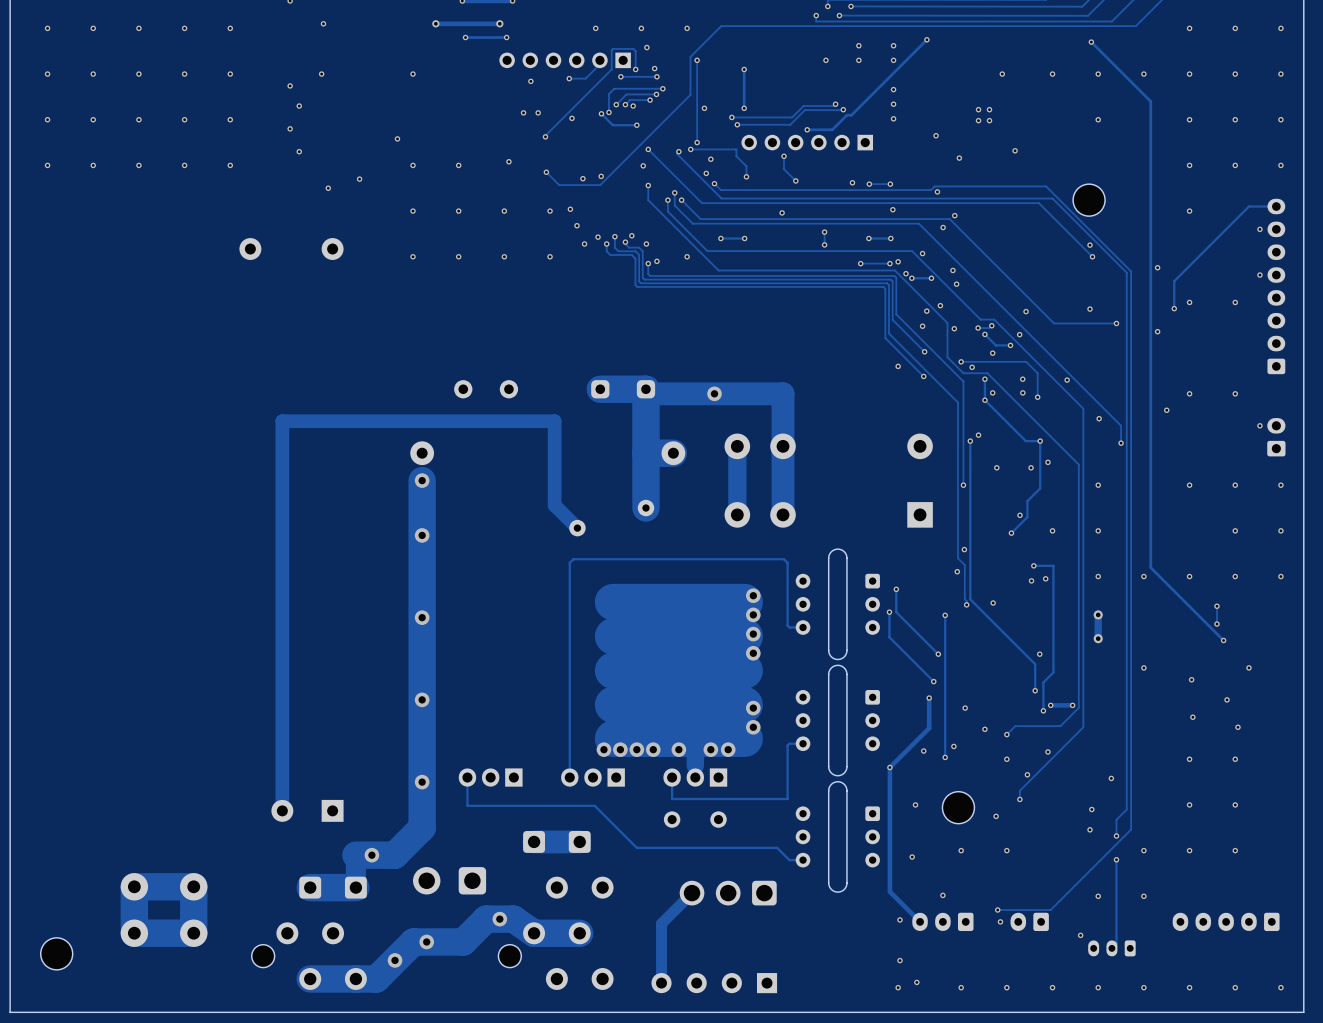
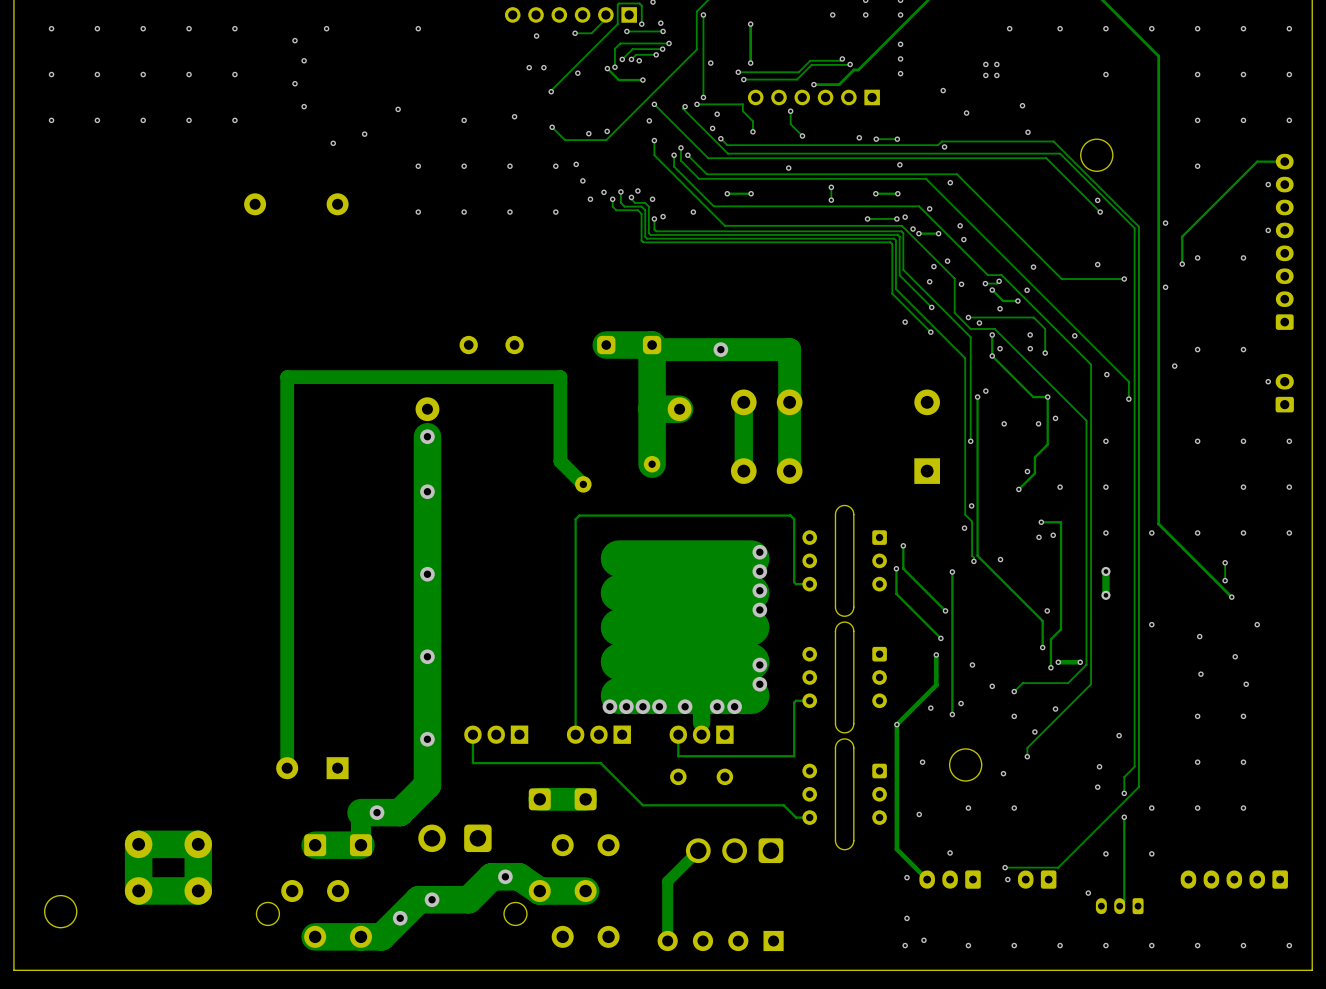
via: (397, 138) -> none
via: none -> (398, 109)
via: (413, 165) -> none
via: none -> (1028, 132)
via: (954, 215) -> none

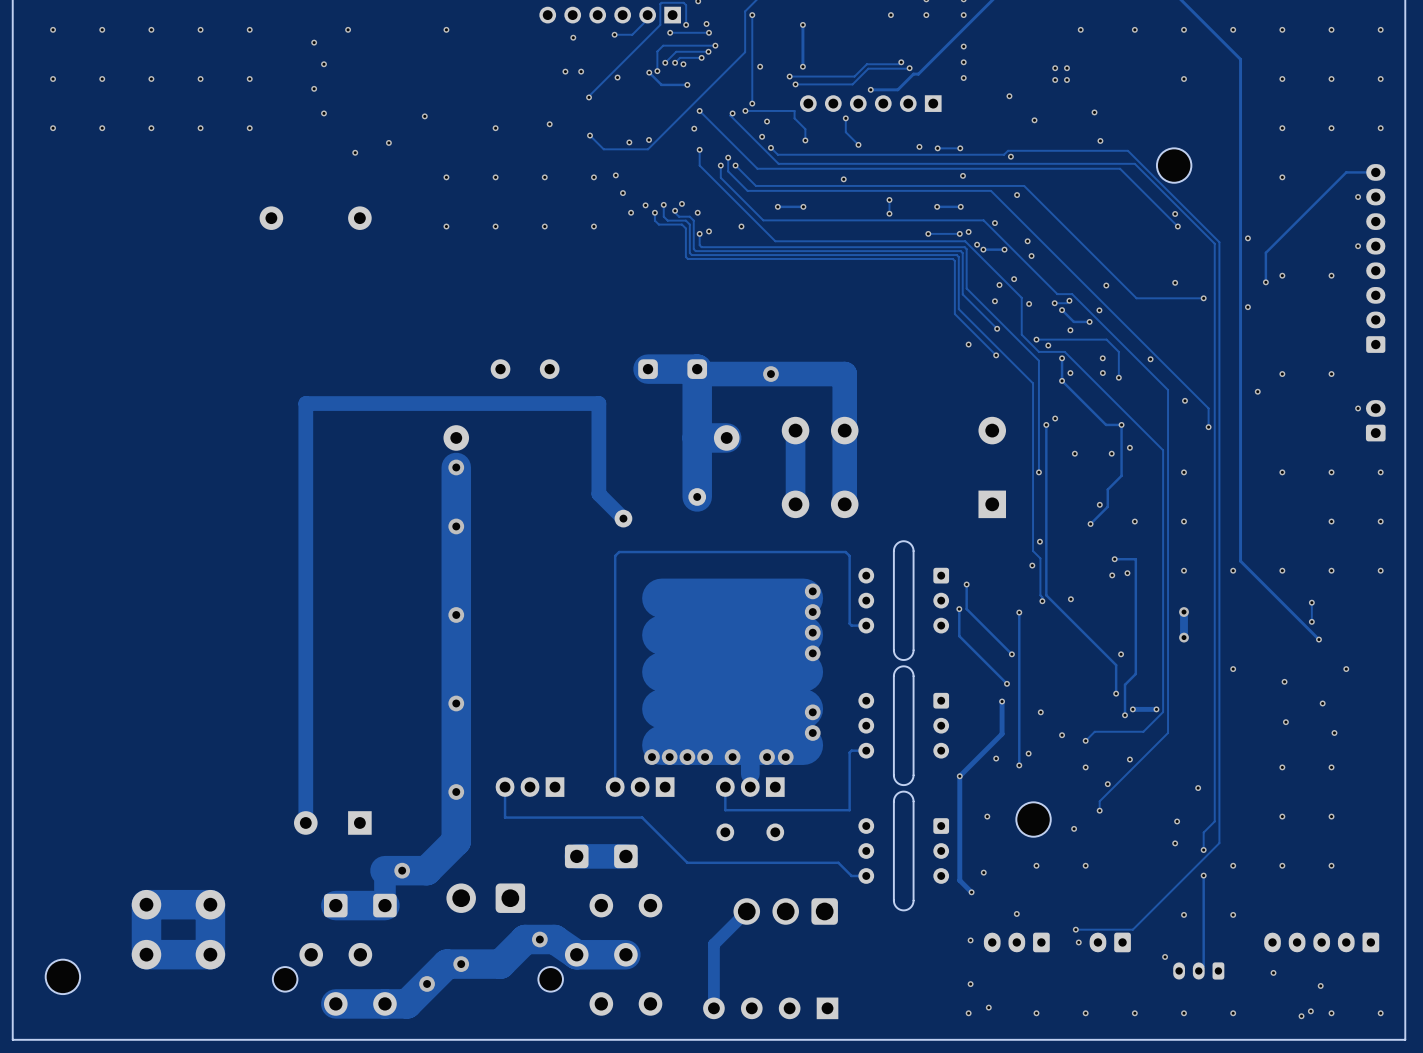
track: (896, 821) (896, 849) (927, 879) -> (959, 880) (971, 892)
via: none -> (971, 892)
via: none -> (1273, 972)
via: none -> (1320, 985)
via: none -> (1310, 1011)
via: (1197, 945) -> none
via: none -> (1301, 1016)

